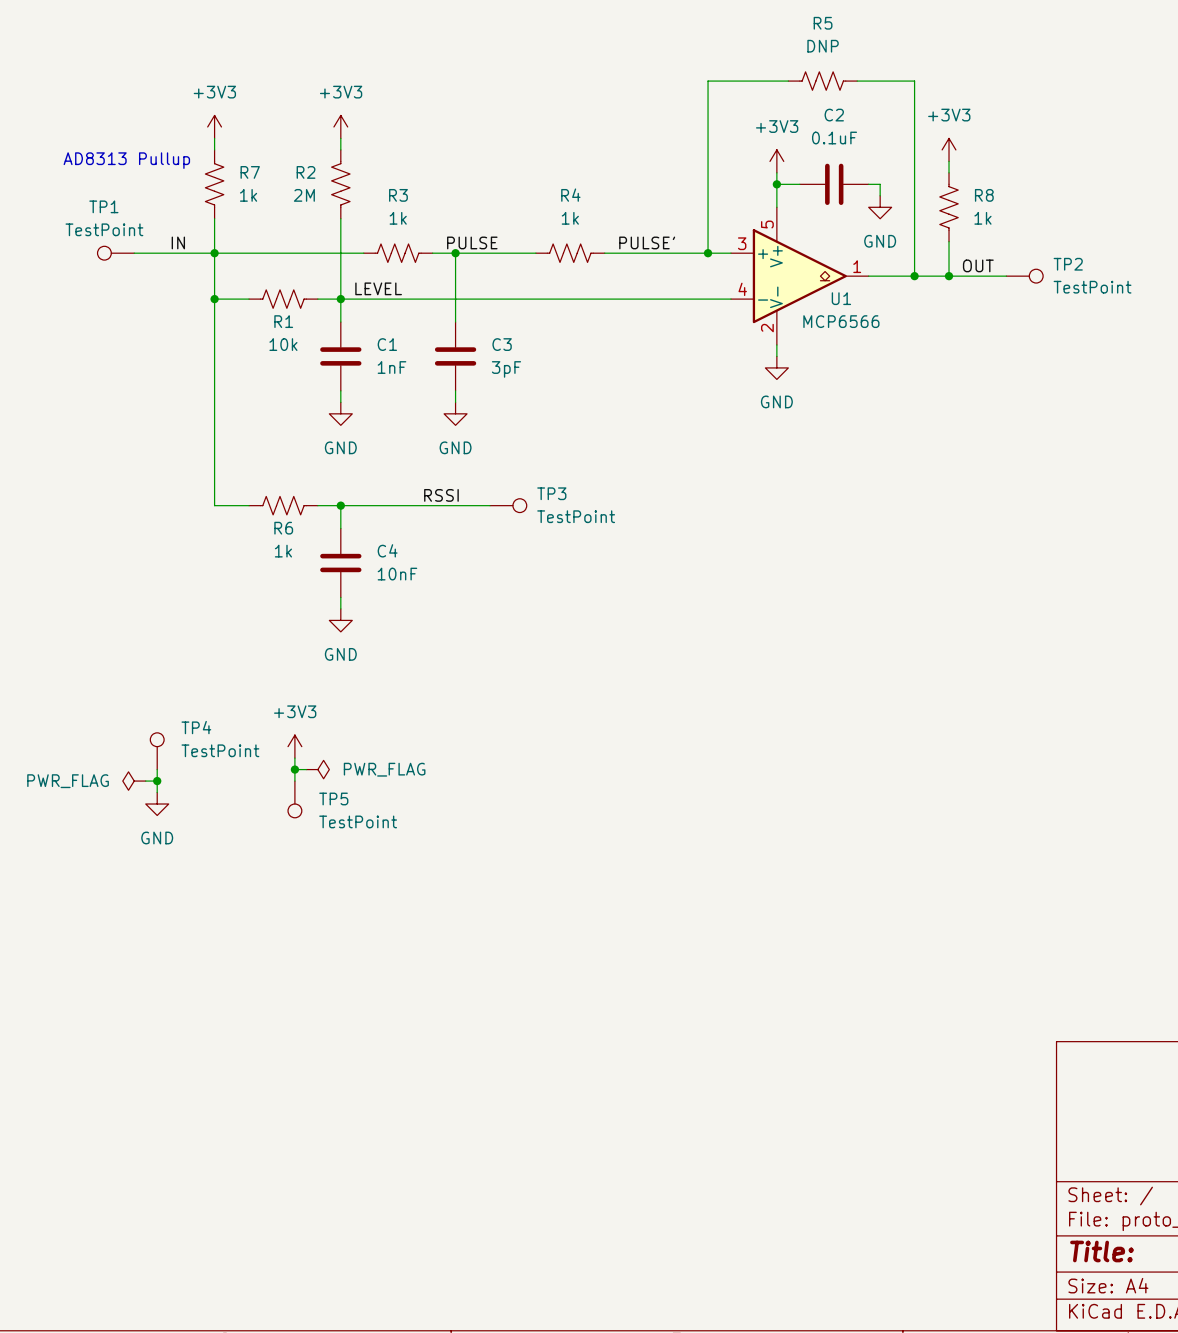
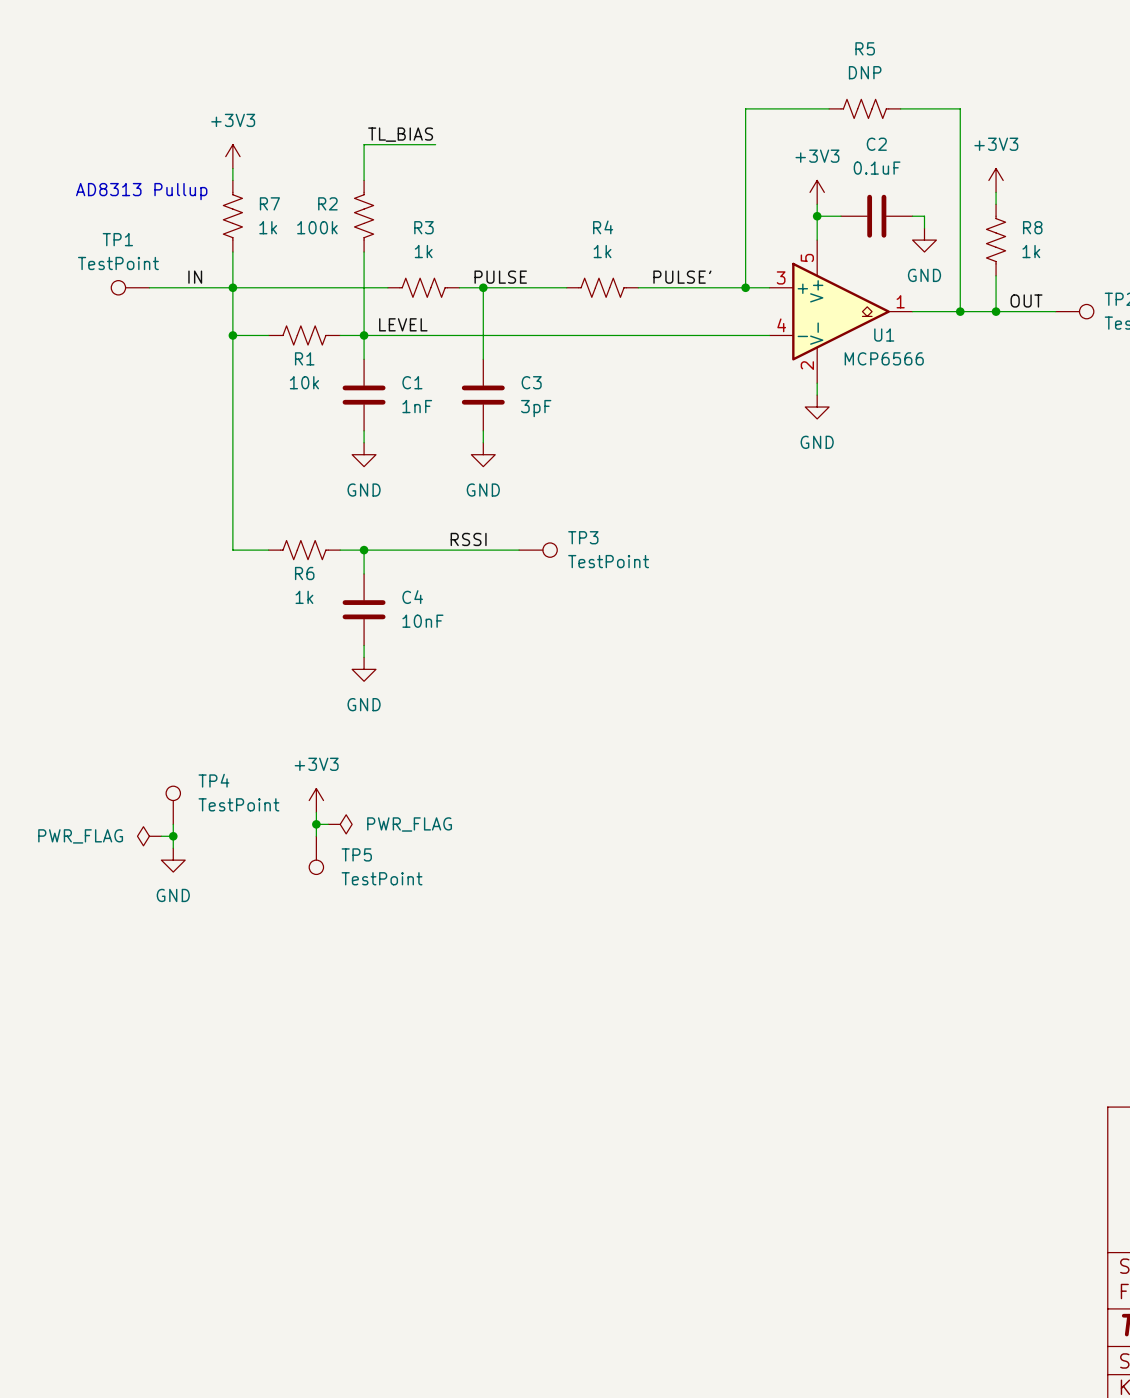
label: none -> TL_BIAS (400, 134)
wire: none -> (435, 144) (364, 144) (364, 168)
power symbol: +3V3 (340, 126) -> none
R2 value: 2M (304, 195) -> 100k (317, 227)

